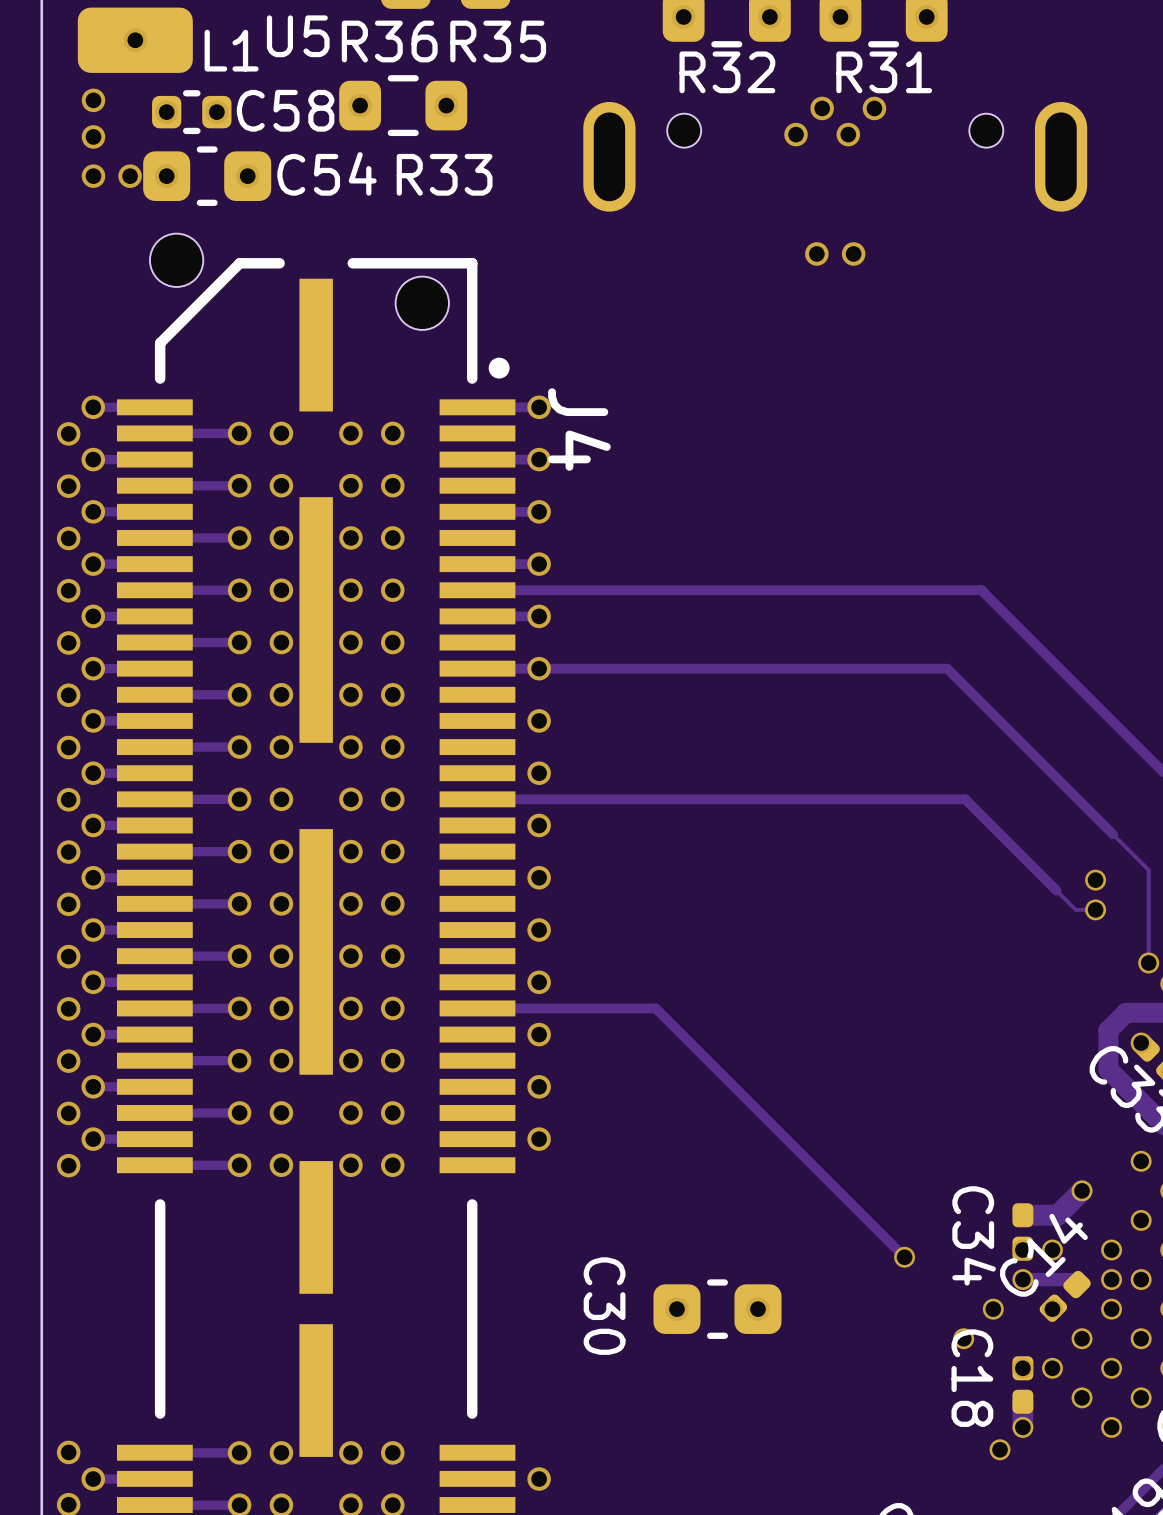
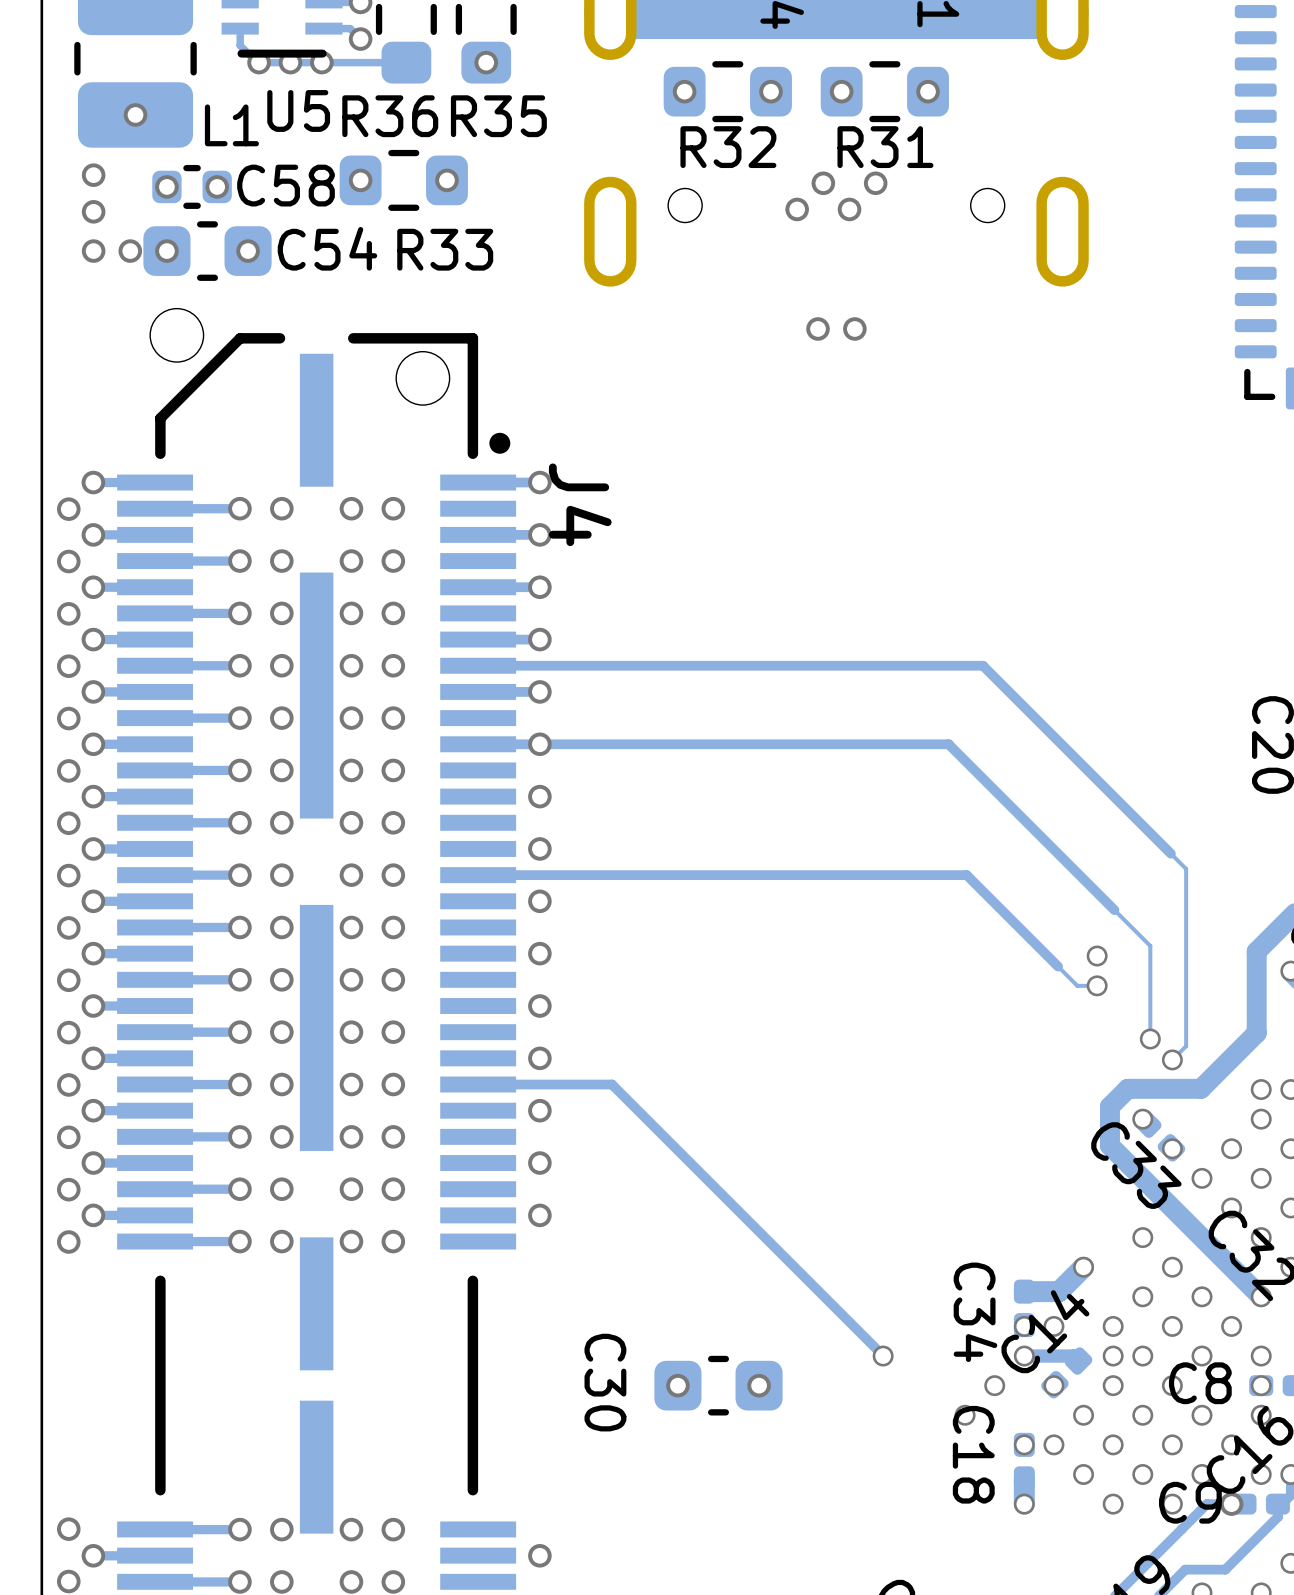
track: (611, 1008) (655, 1008) (904, 1257) -> (611, 1084) (883, 1355)
via position: (904, 1257) -> (883, 1356)
via: (1000, 1449) -> none

